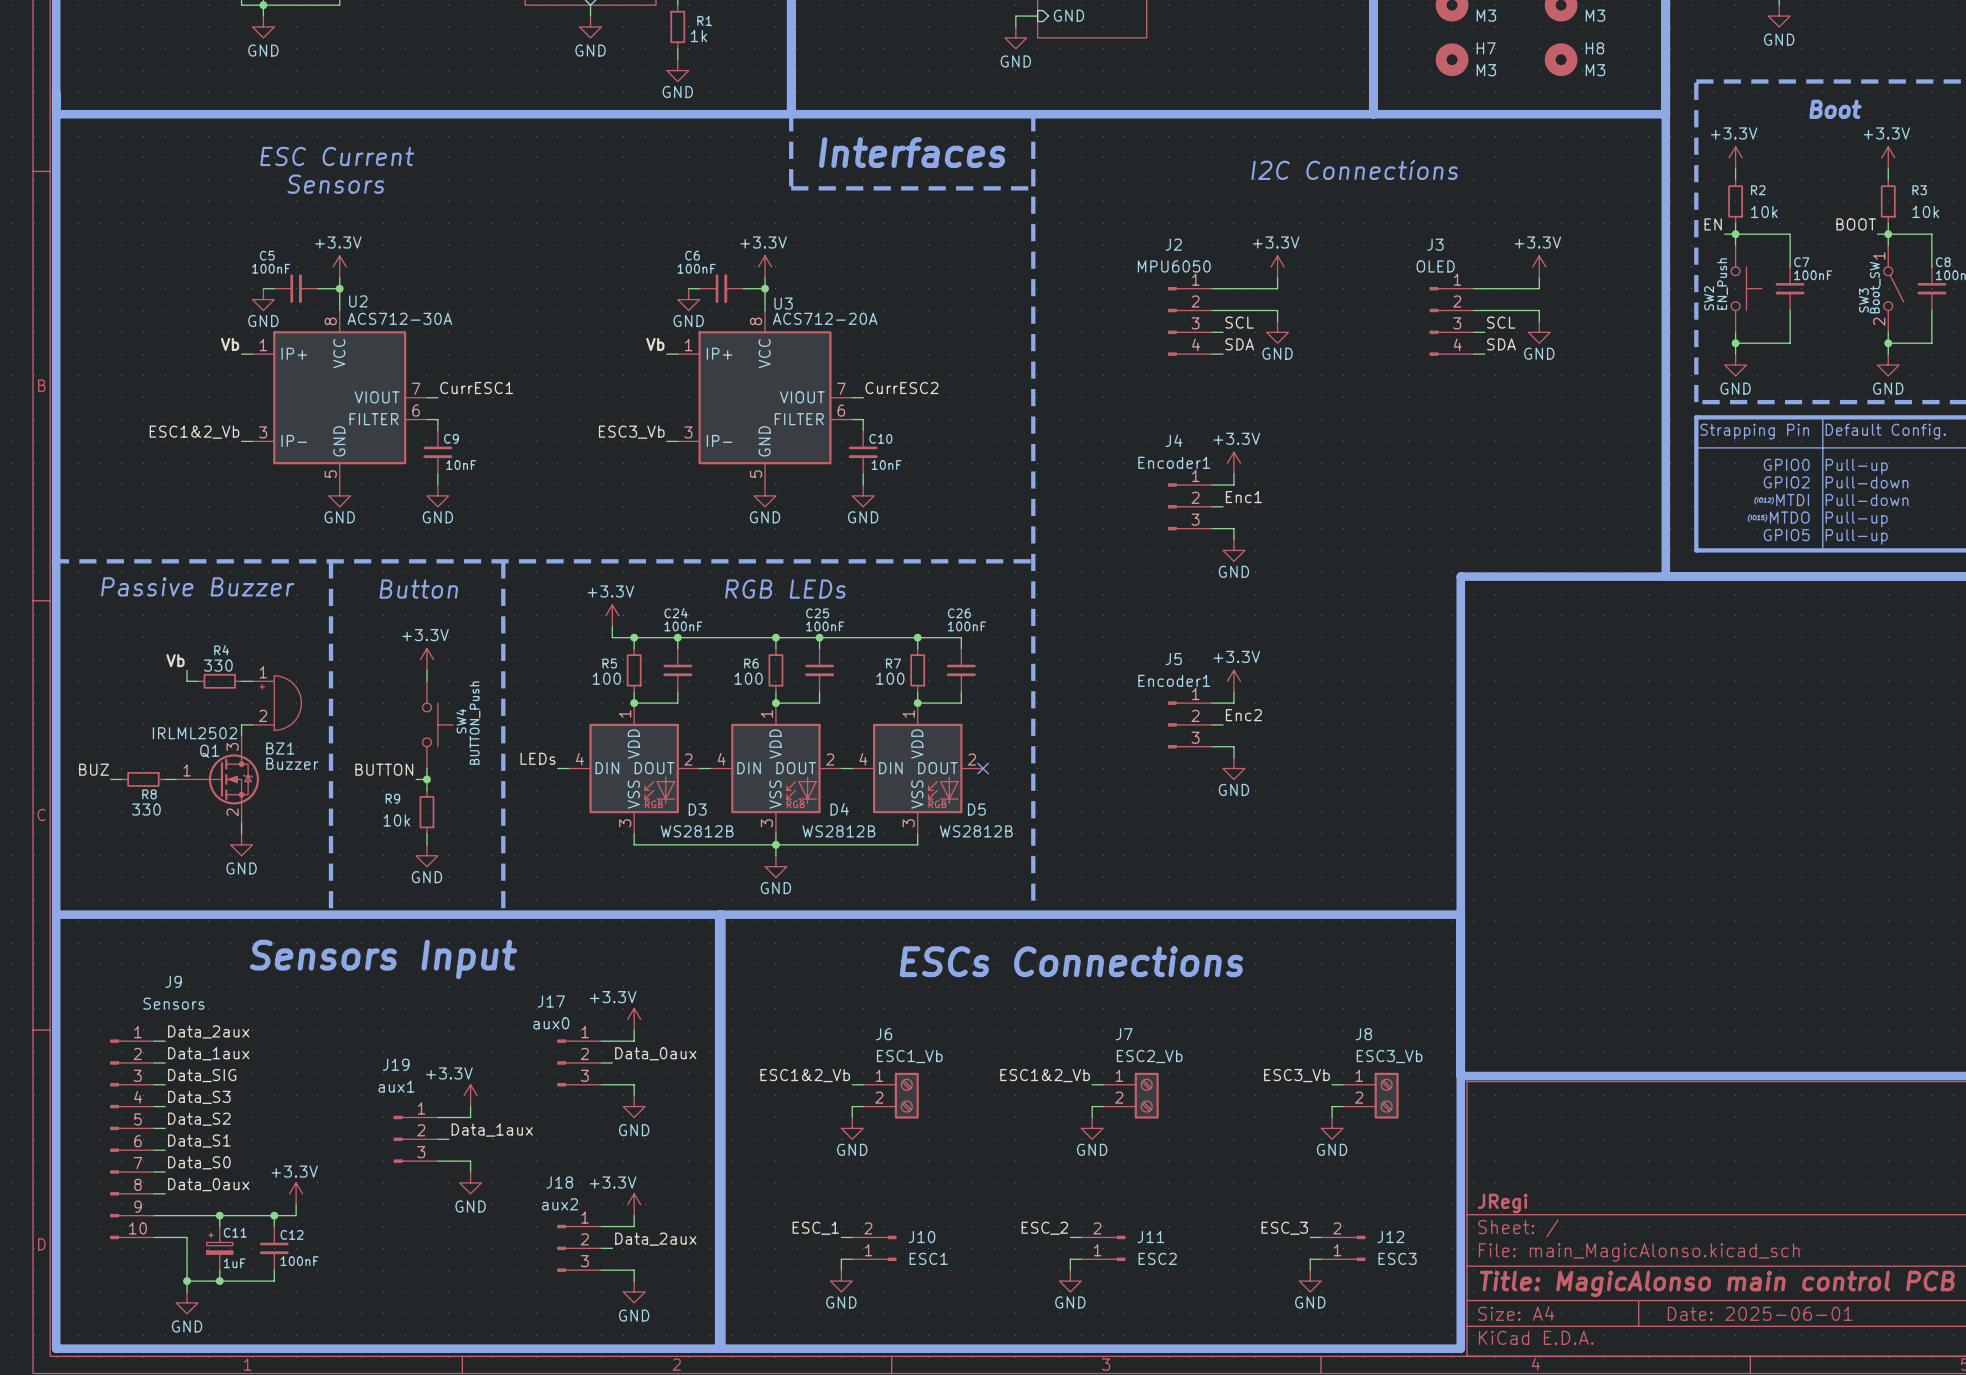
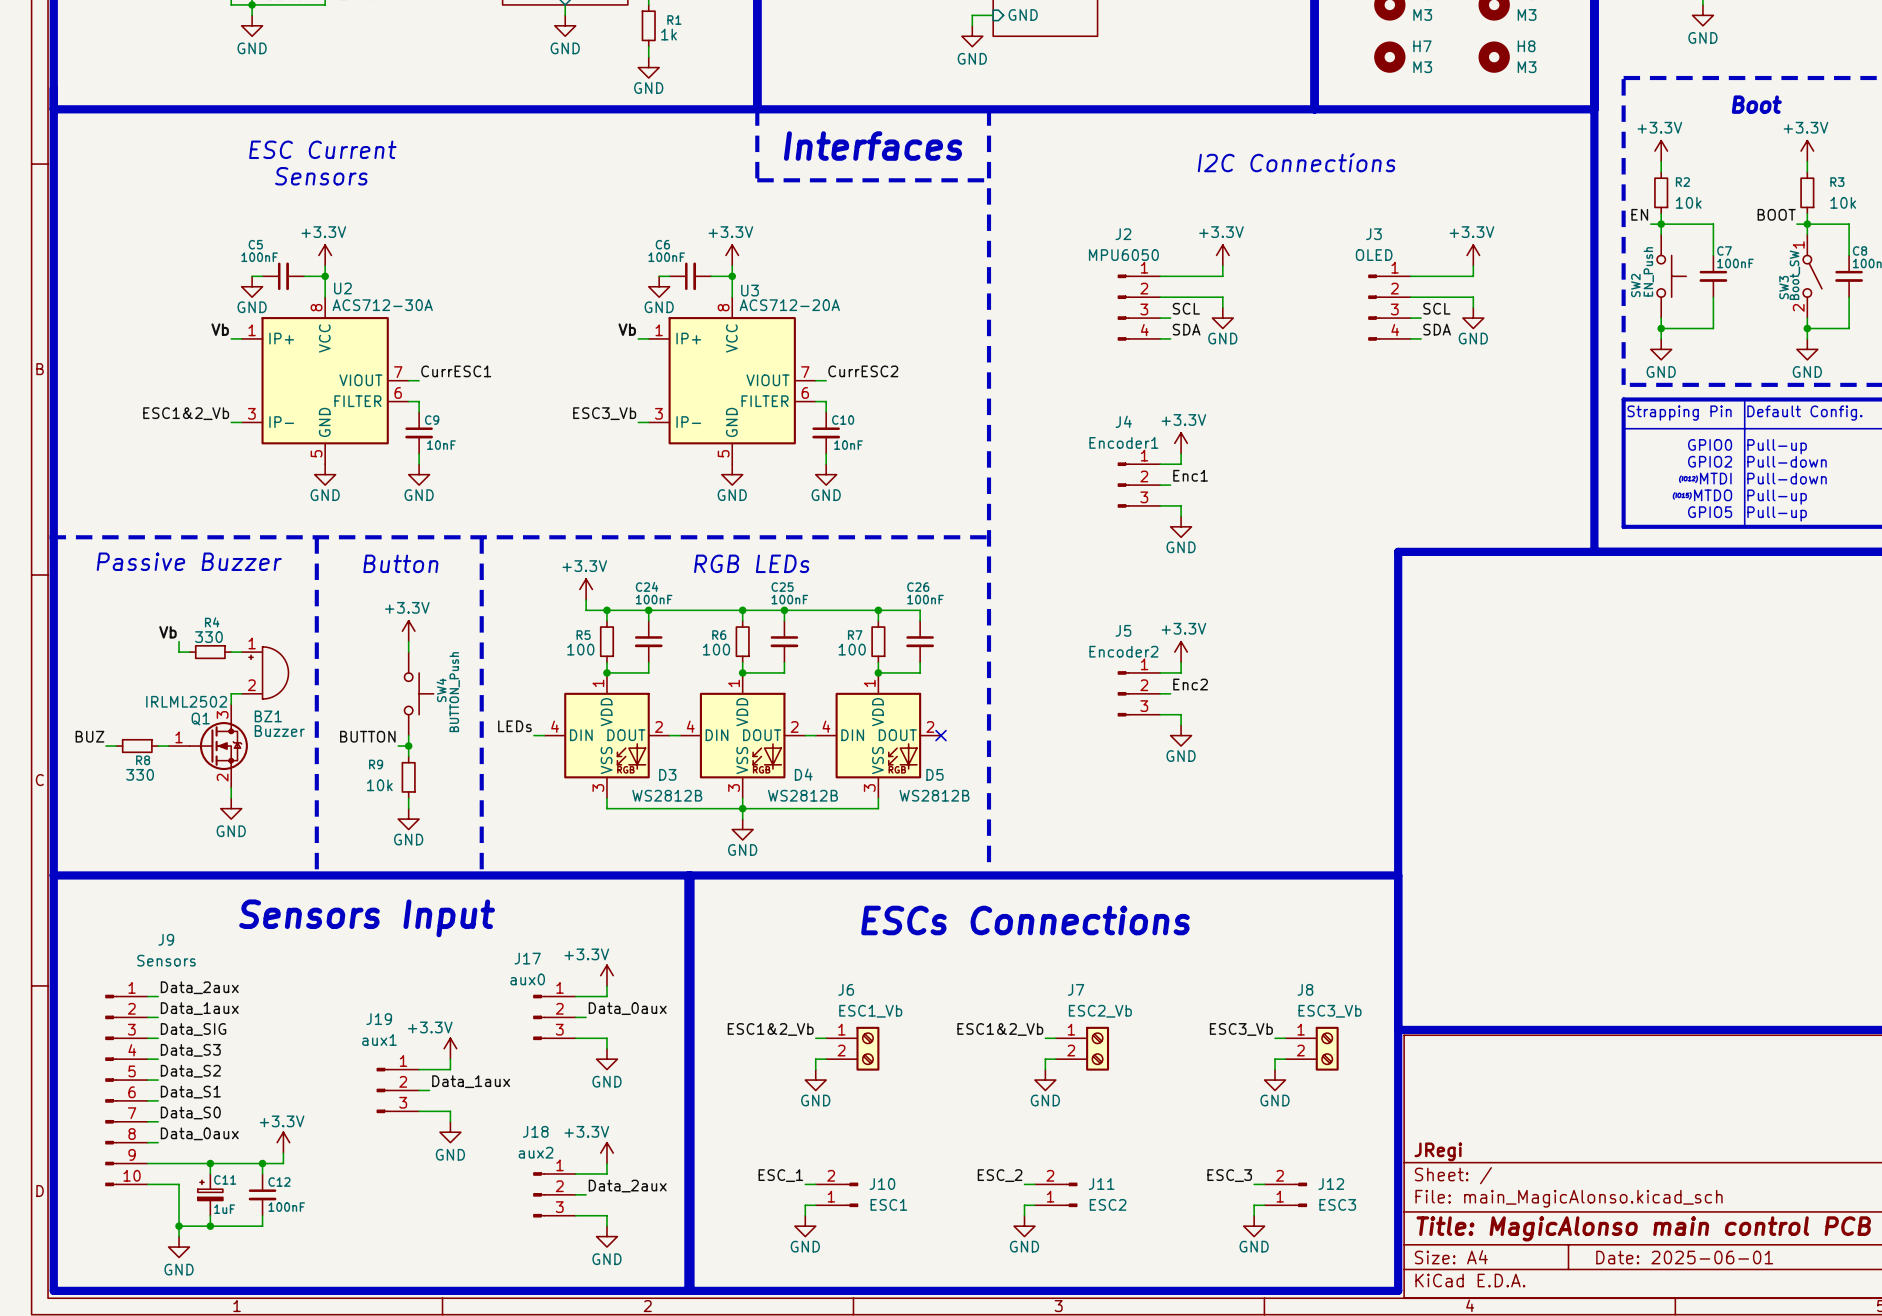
J5 value: Encoder1 (1174, 680) -> Encoder2 (1123, 651)

